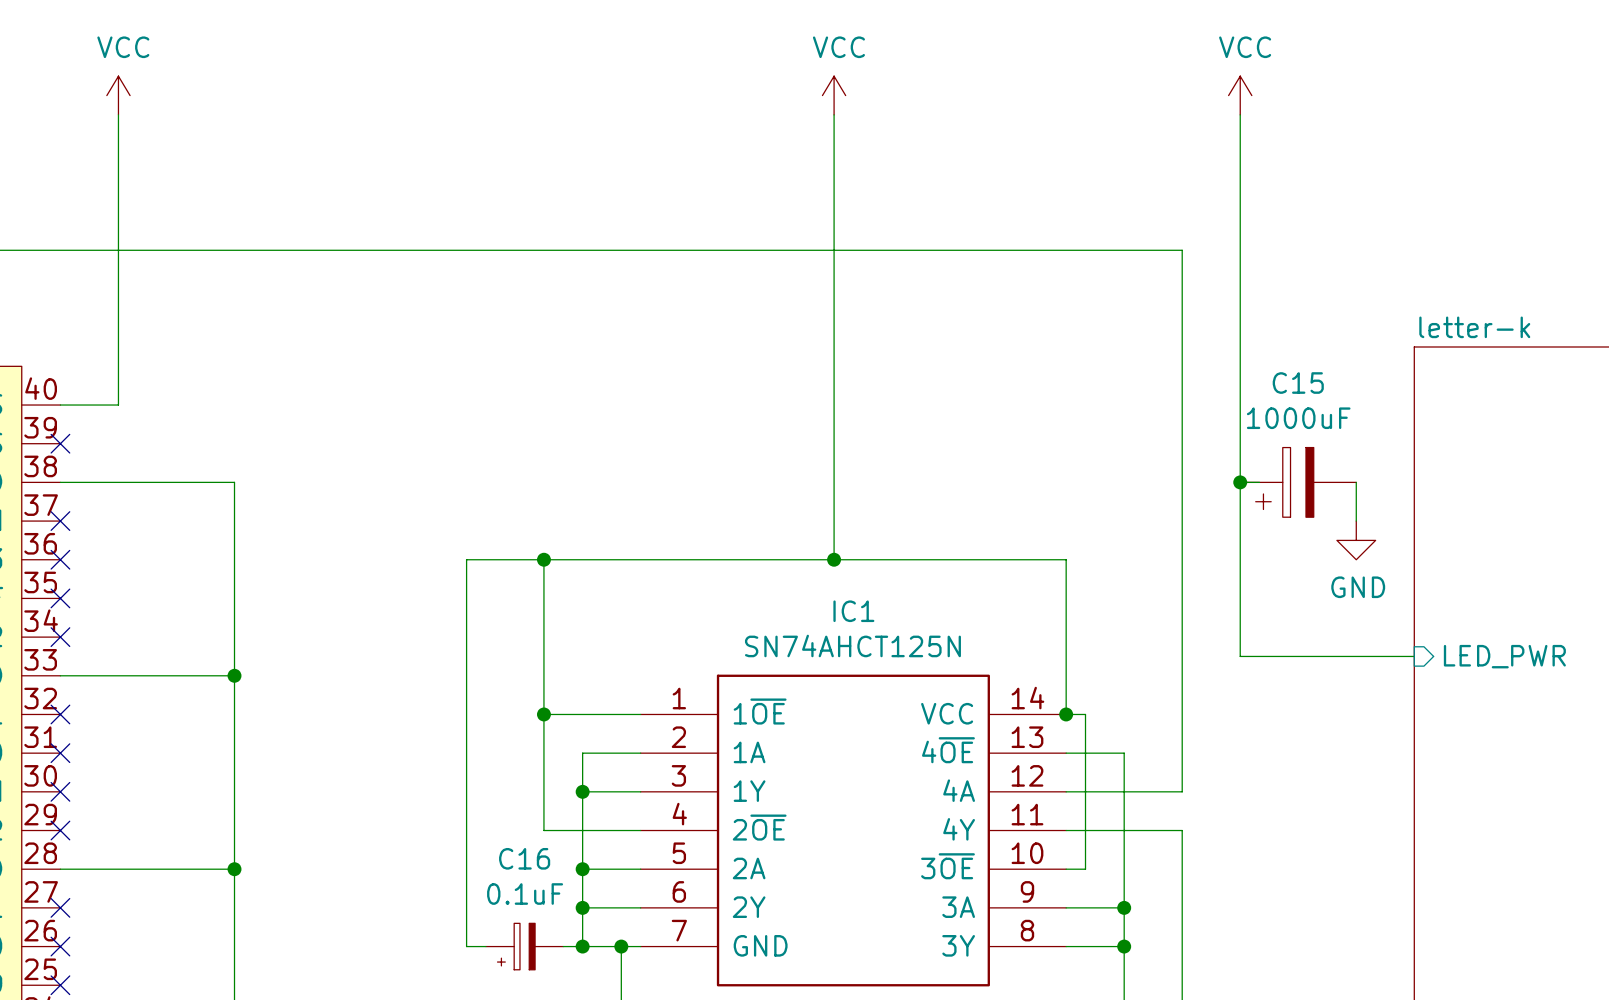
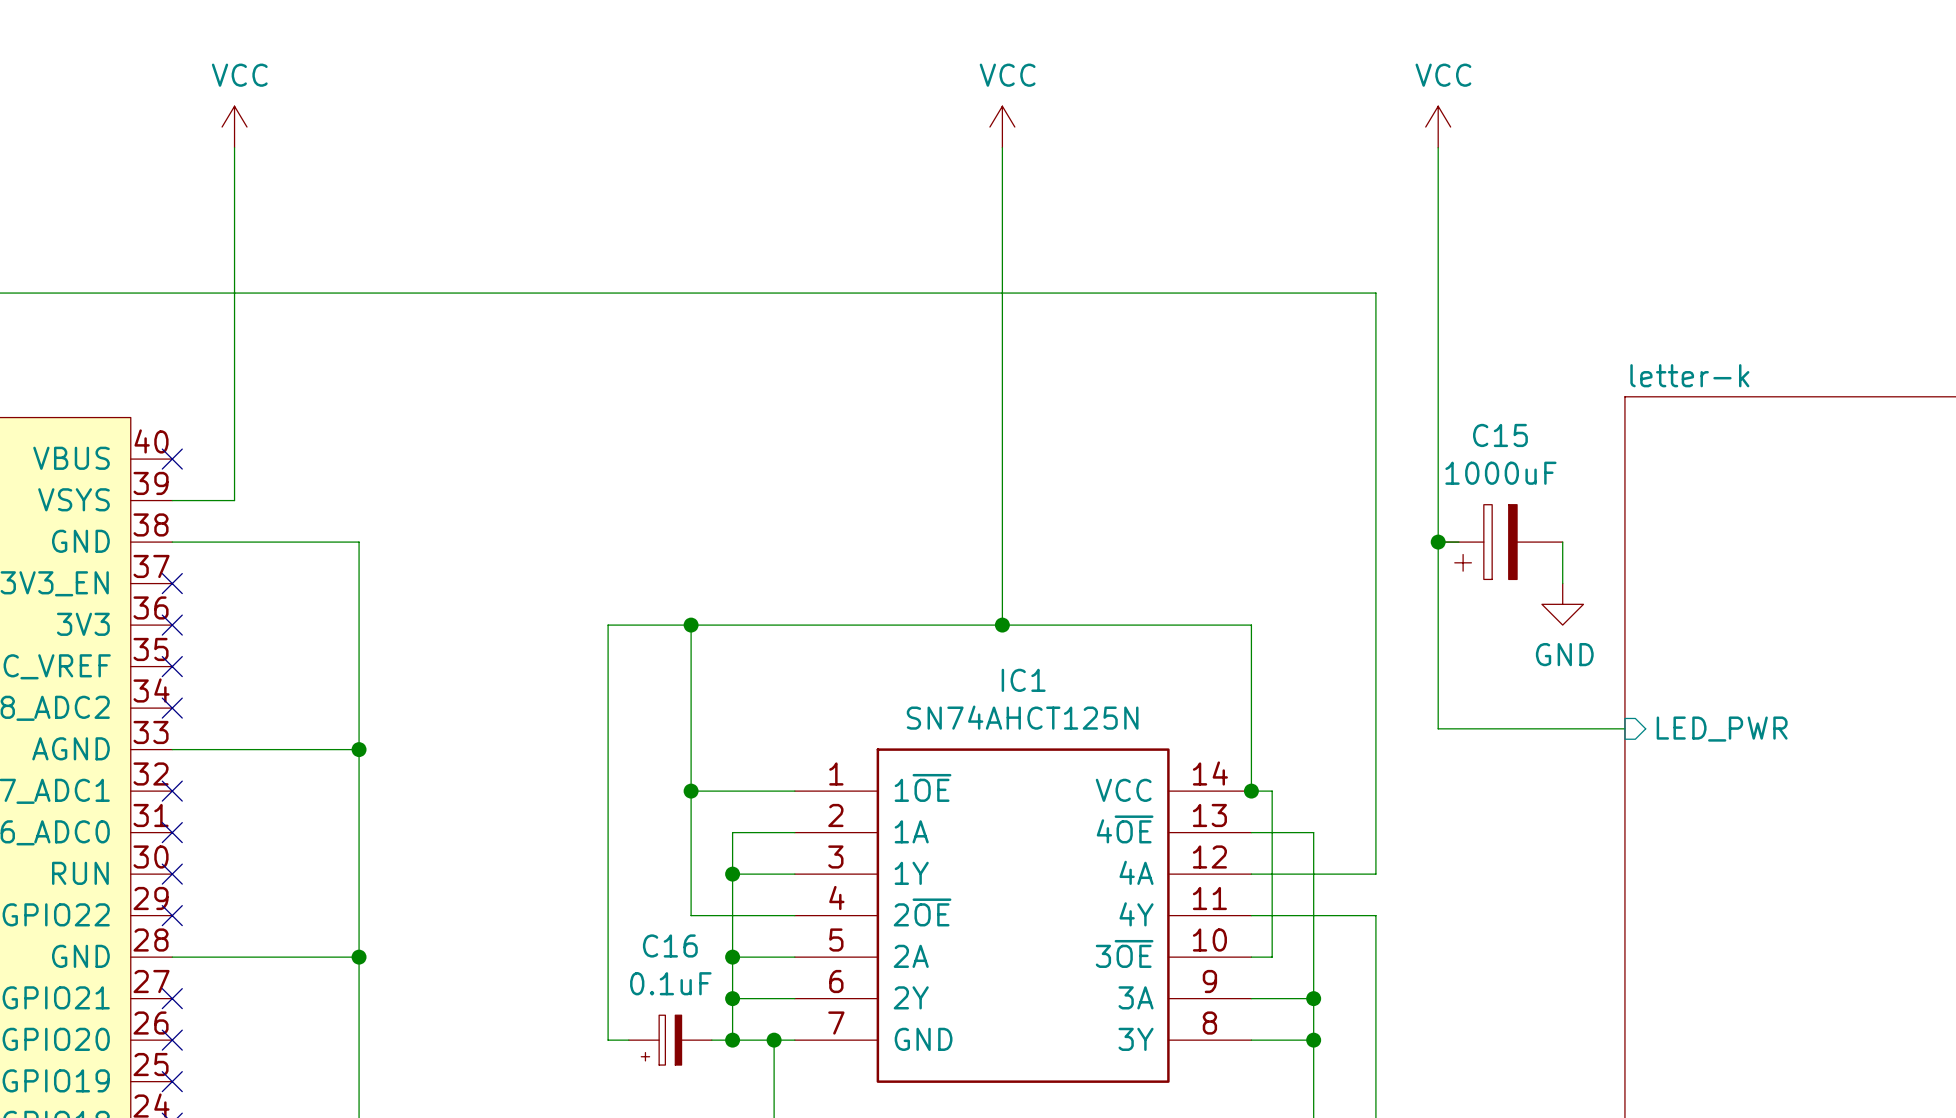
wire: (60, 405) (118, 405) -> (172, 500) (234, 500) (234, 459)
no-connect mark position: (60, 443) -> (172, 459)

